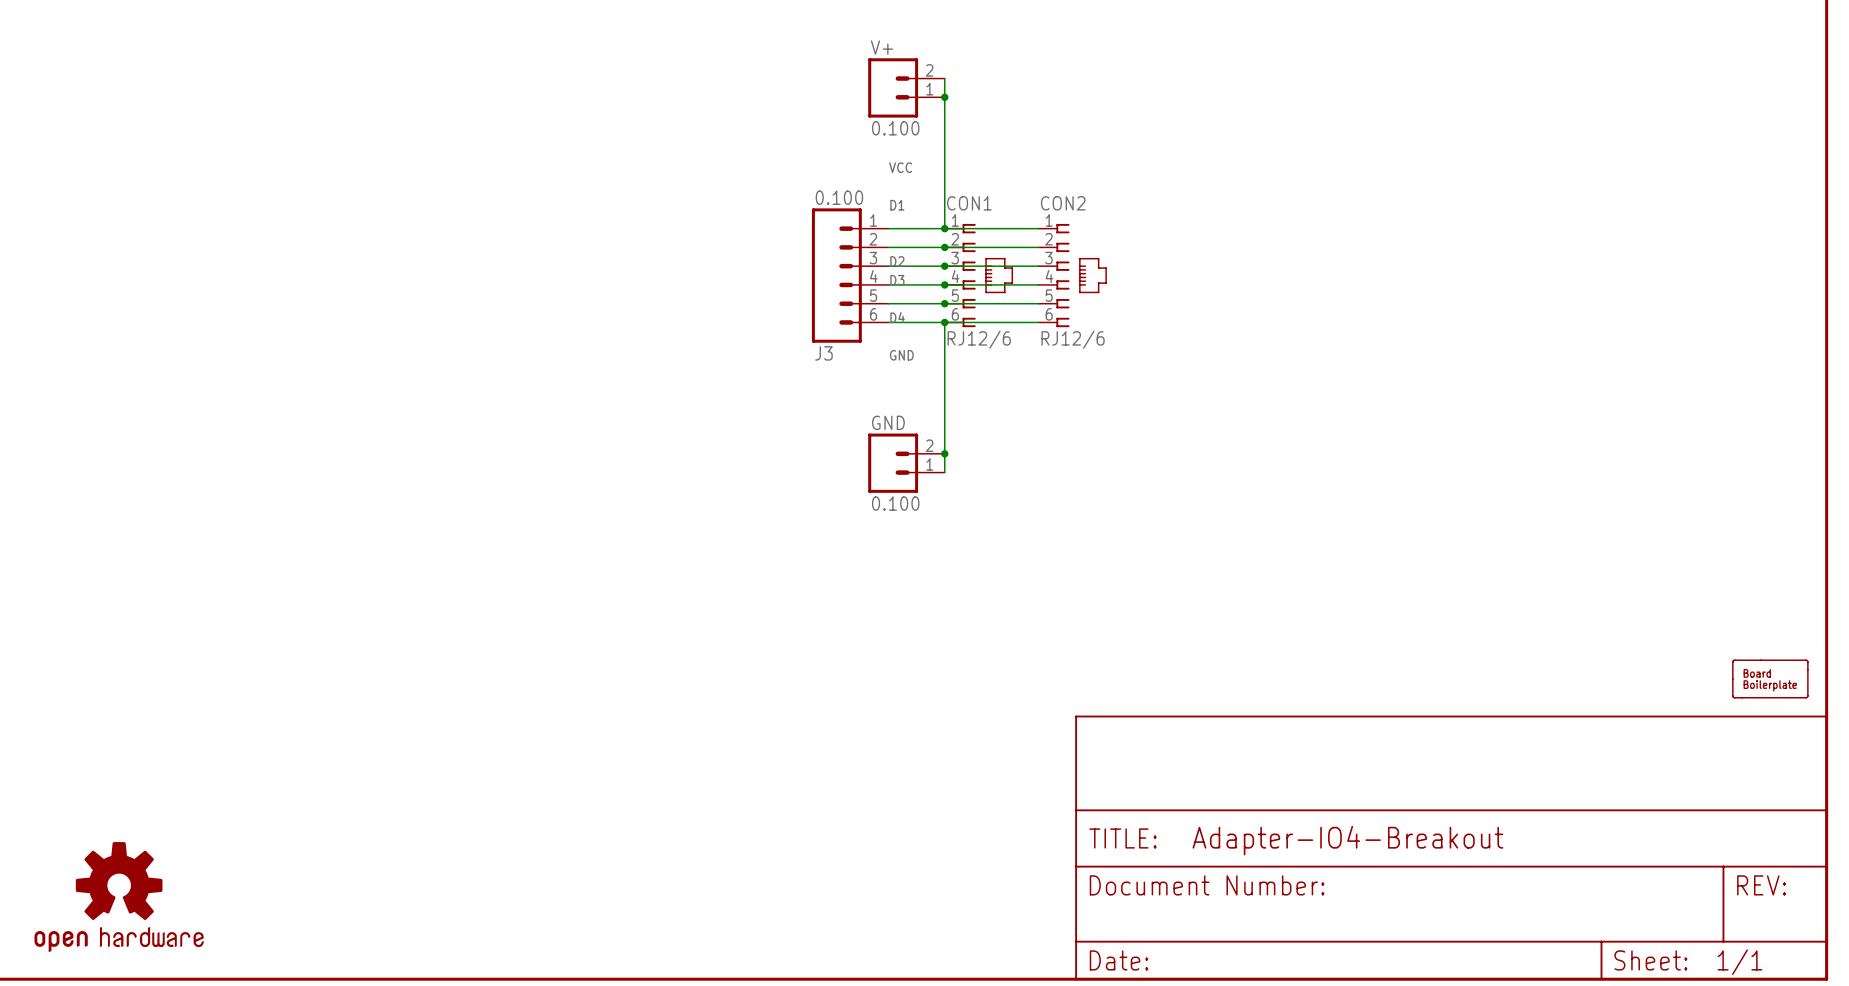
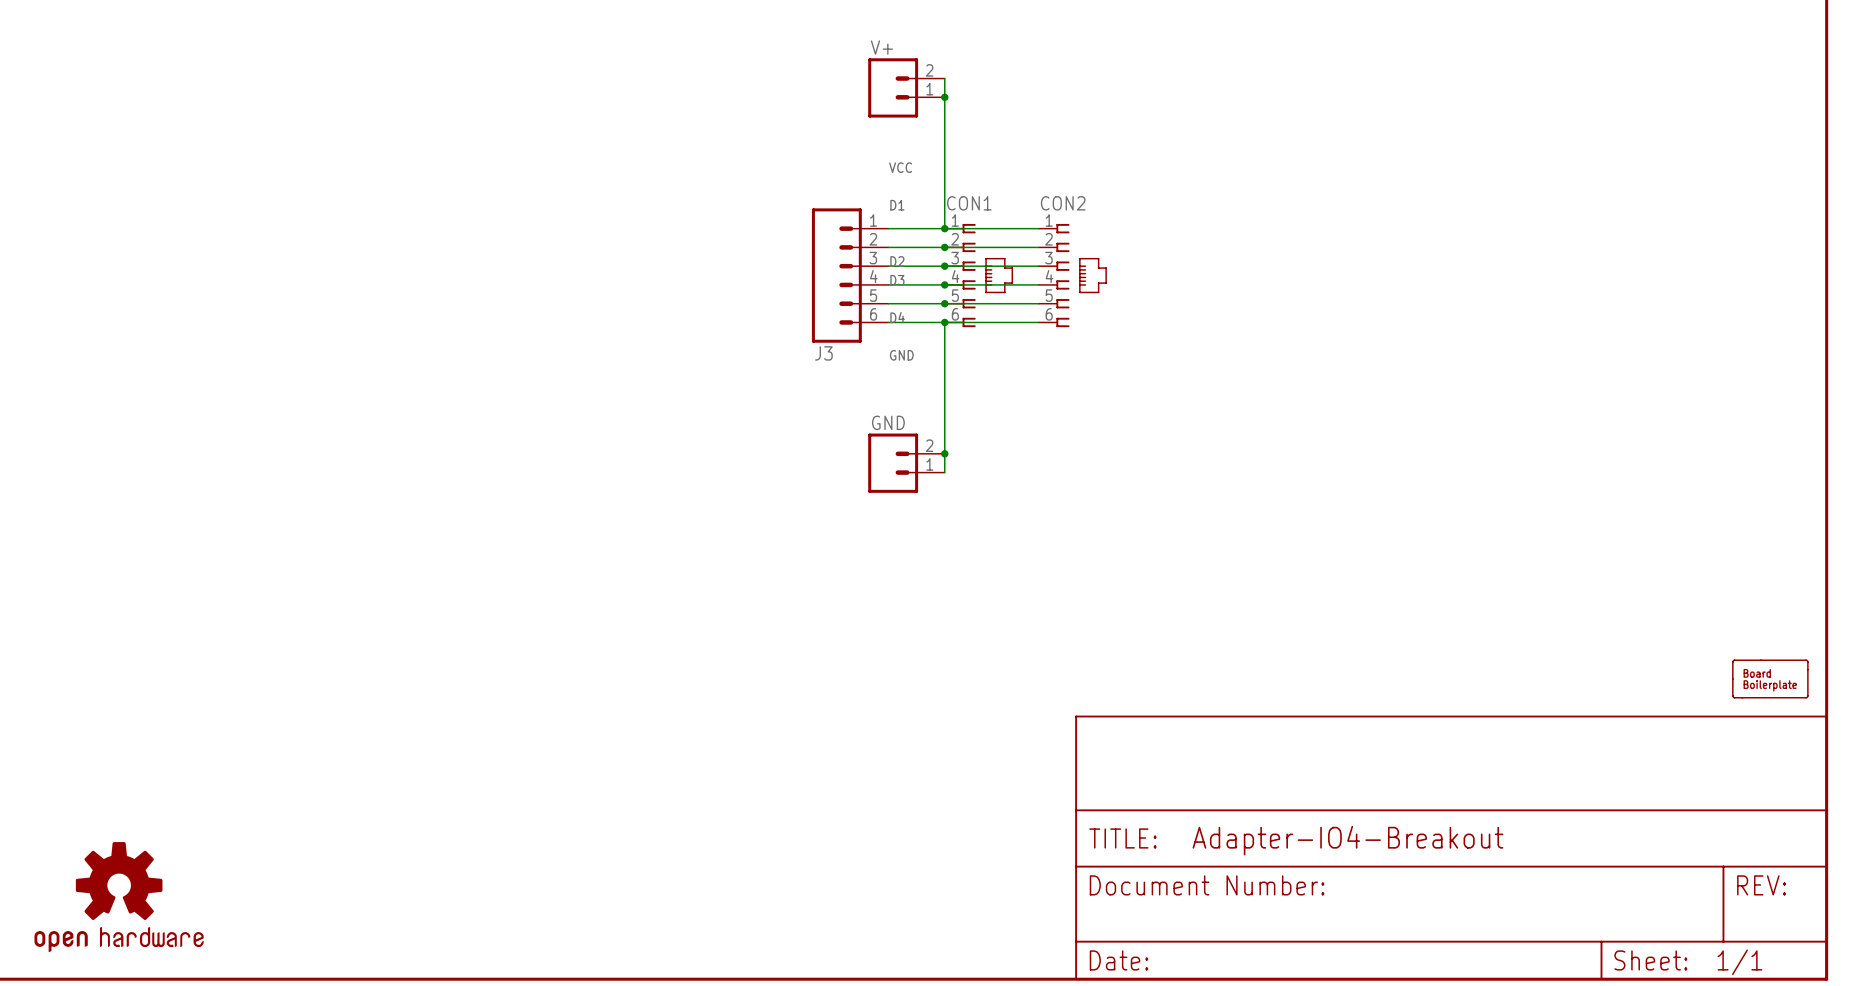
V+ value: 0.100 (895, 128) -> none
J3 value: 0.100 (839, 197) -> none
CON1 value: RJ12/6 (979, 339) -> none
CON2 value: RJ12/6 (1073, 339) -> none
GND value: 0.100 (895, 503) -> none

